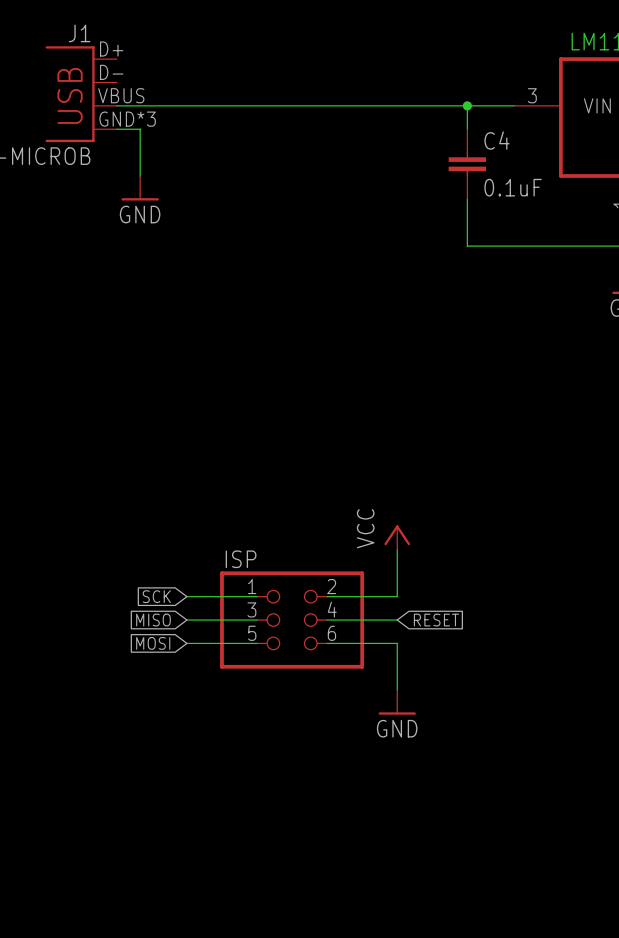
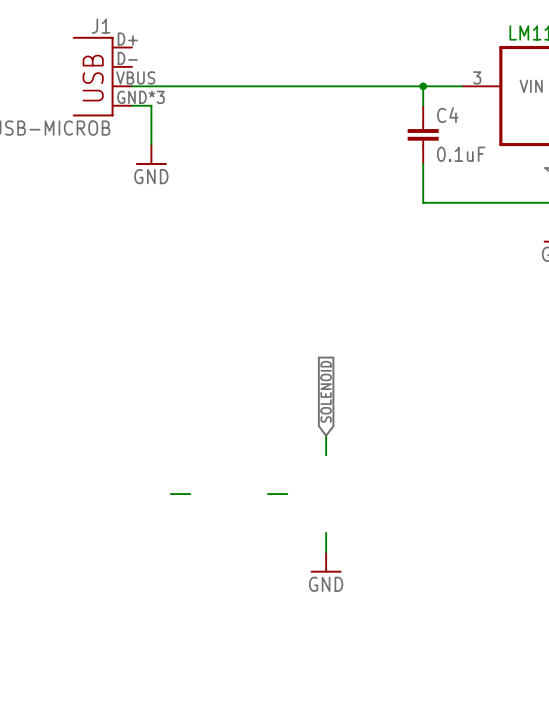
global label: none -> SOLENOID (326, 391)
wire: none -> (326, 435) (326, 455)
power symbol: VCC (397, 537) -> none
wire: (397, 549) (397, 596) (327, 596) -> none
global label: SCK (156, 596) -> none
wire: (186, 596) (257, 596) -> (190, 494) (170, 494)
wire: none -> (267, 494) (287, 494)
global label: MISO (153, 620) -> none
wire: (186, 620) (257, 620) -> none
ISP: (292, 620) -> none
wire: (327, 620) (397, 620) -> none
global label: RESET (436, 620) -> none
global label: MOSI (153, 643) -> none
wire: (186, 643) (257, 643) -> none
wire: (327, 643) (397, 643) (397, 690) -> none
wire: none -> (326, 532) (326, 552)
power symbol position: GND (397, 702) -> GND (326, 562)

